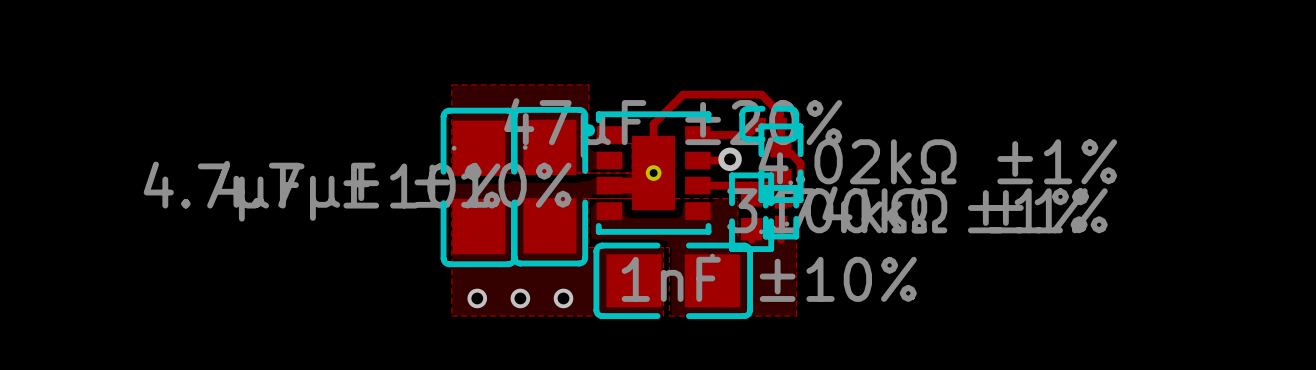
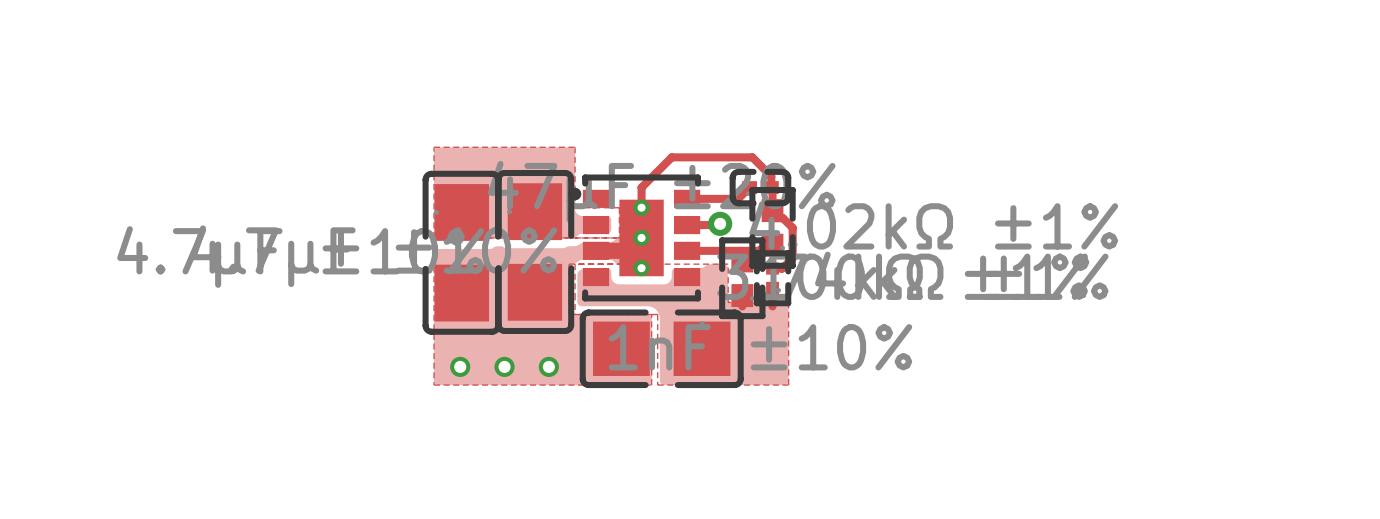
part footprint: [582, 111, 712, 235] -> [568, 174, 702, 302]

